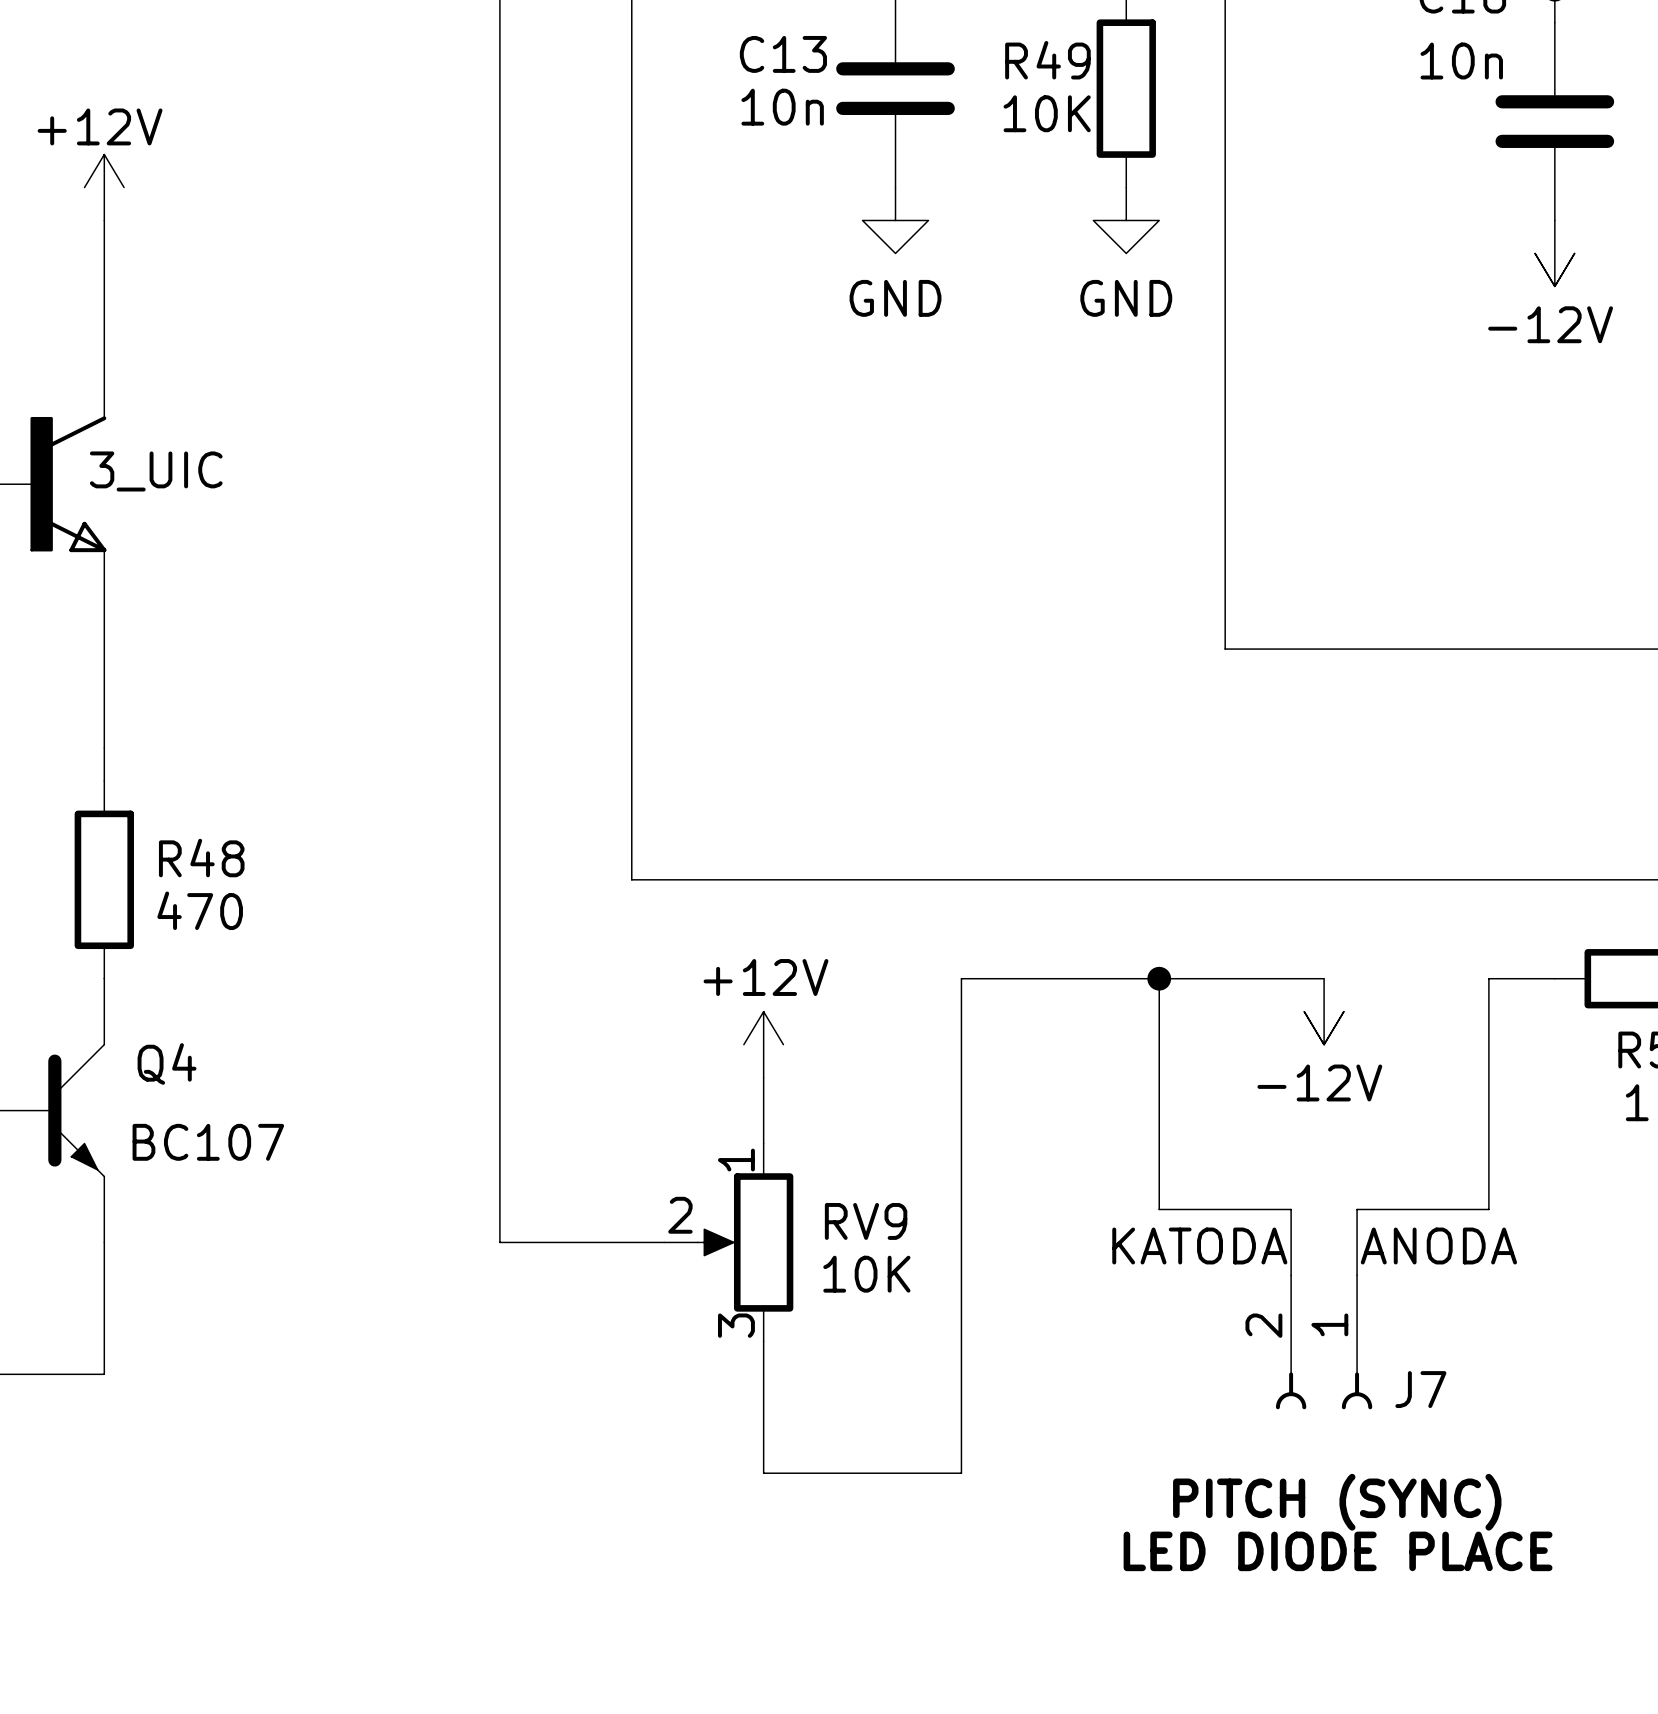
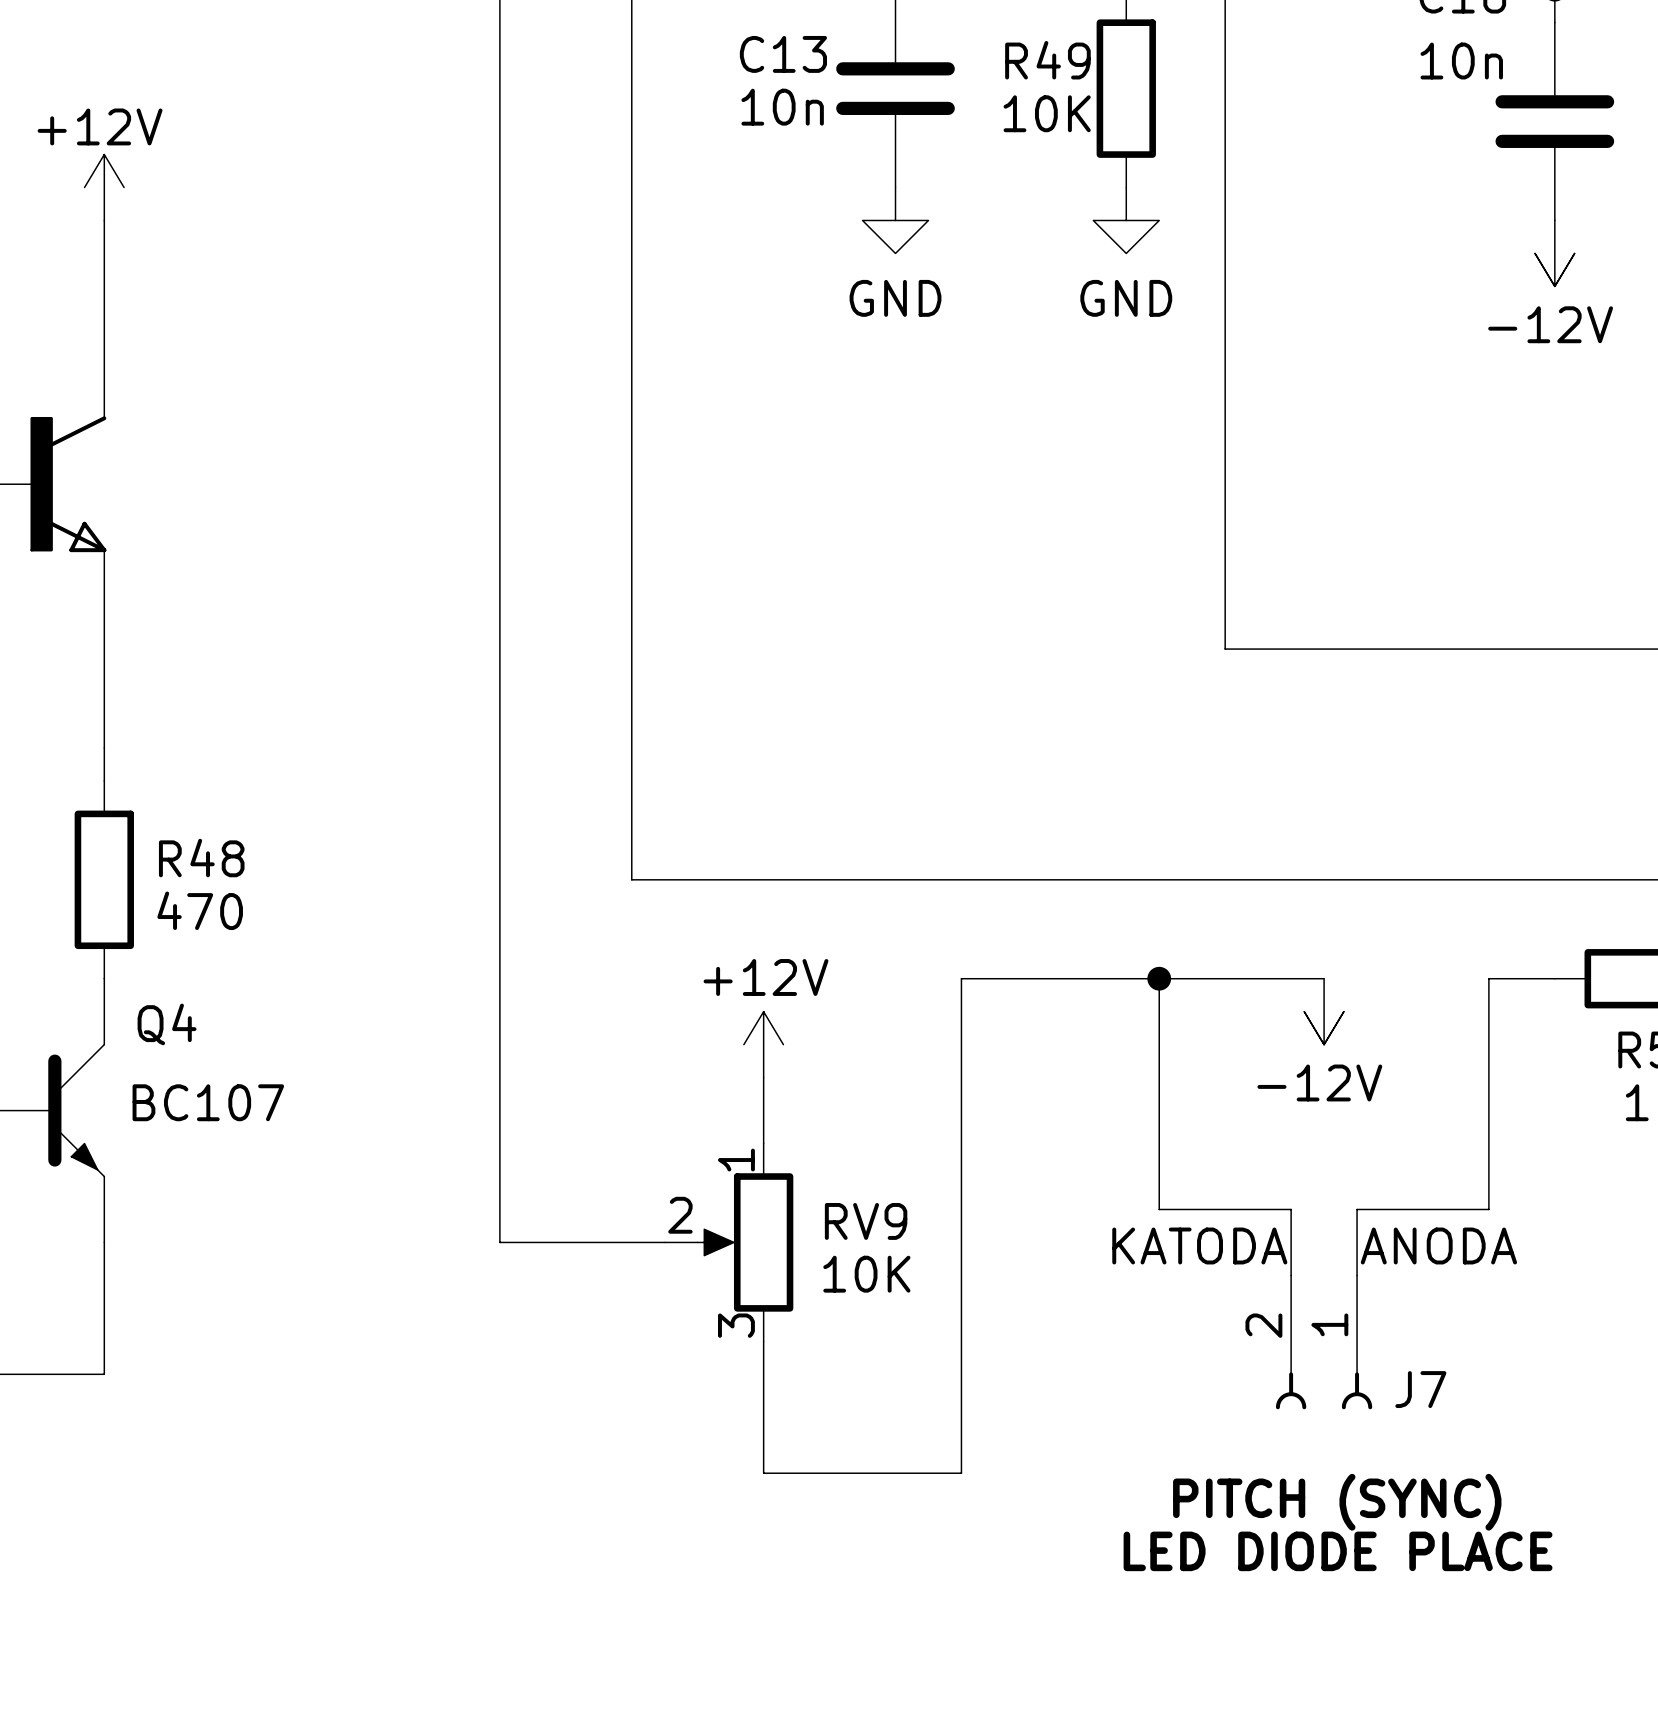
text: 3_UIC (156, 471) -> none
Q4 name position: Q4 (167, 1063) -> Q4 (167, 1024)
Q4 value position: BC107 (208, 1142) -> BC107 (208, 1102)

